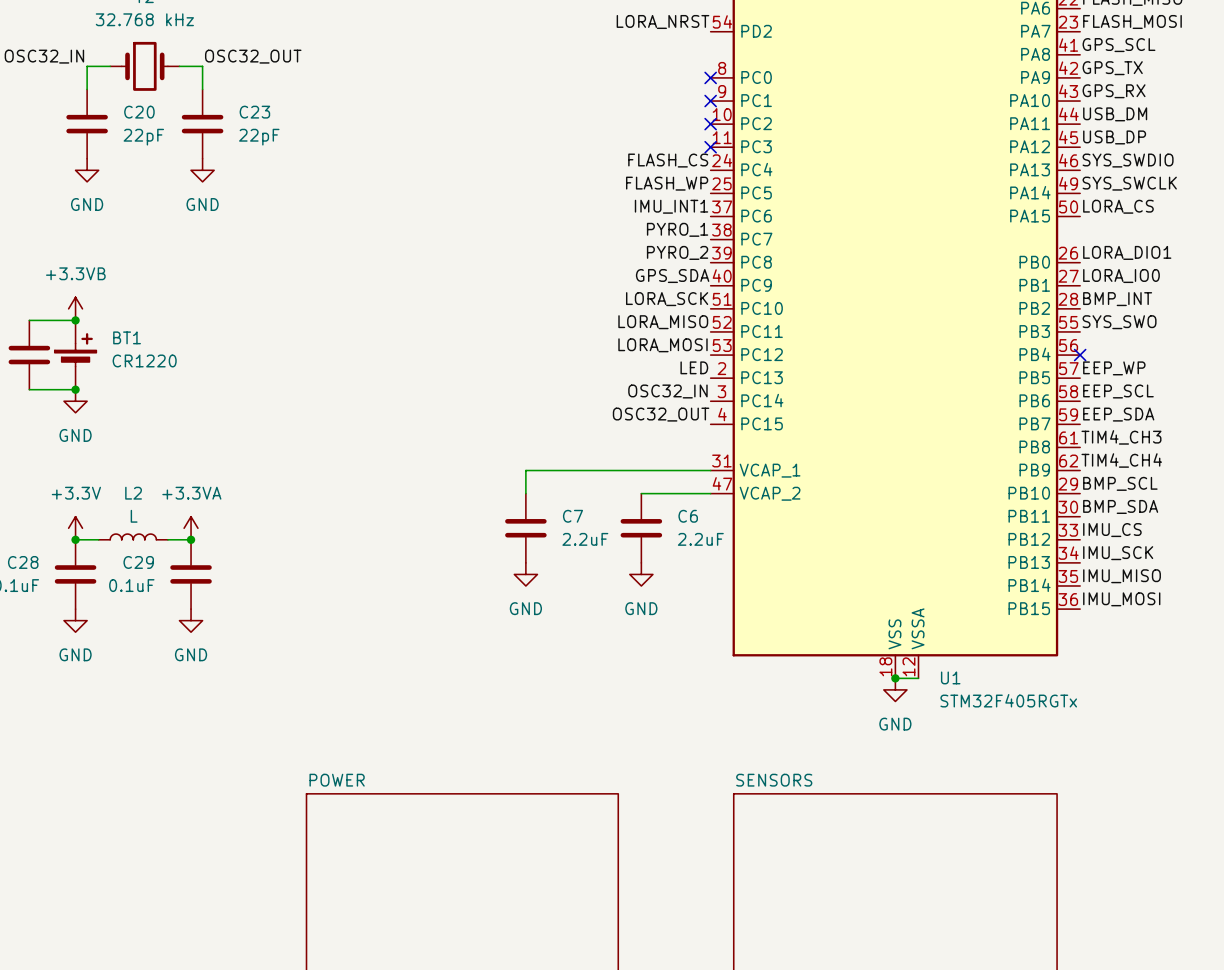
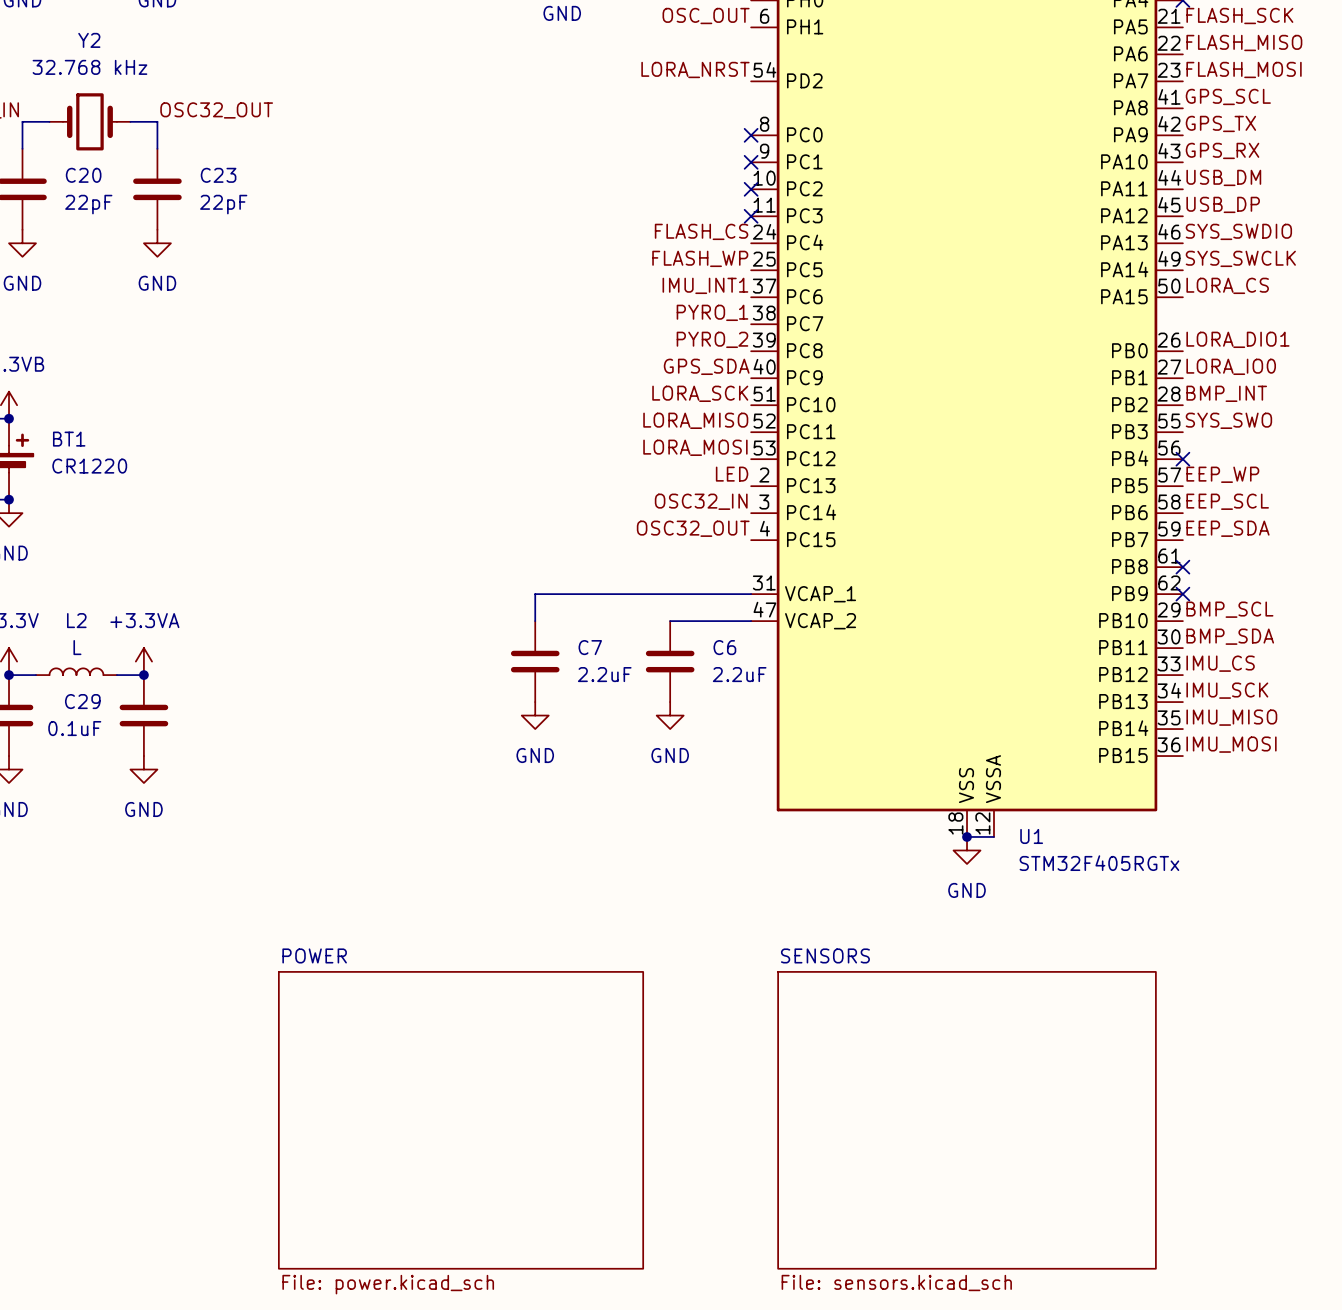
label: TIM4_CH3 (1121, 437) -> none
no-connect mark: none -> (1182, 567)
label: TIM4_CH4 (1121, 460) -> none
no-connect mark: none -> (1182, 594)

